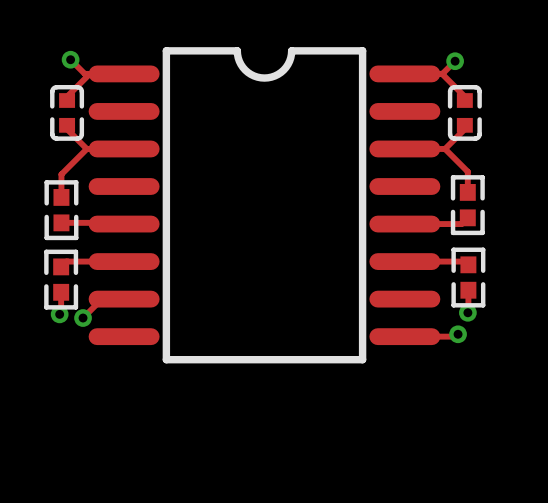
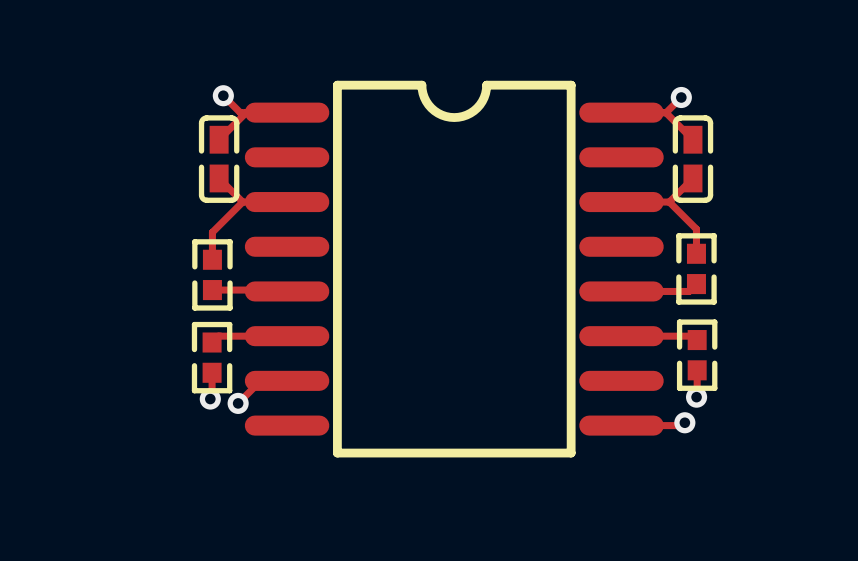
part footprint: [50, 84, 85, 141] -> [198, 115, 240, 203]
part footprint: [447, 84, 482, 141] -> [672, 115, 714, 203]

